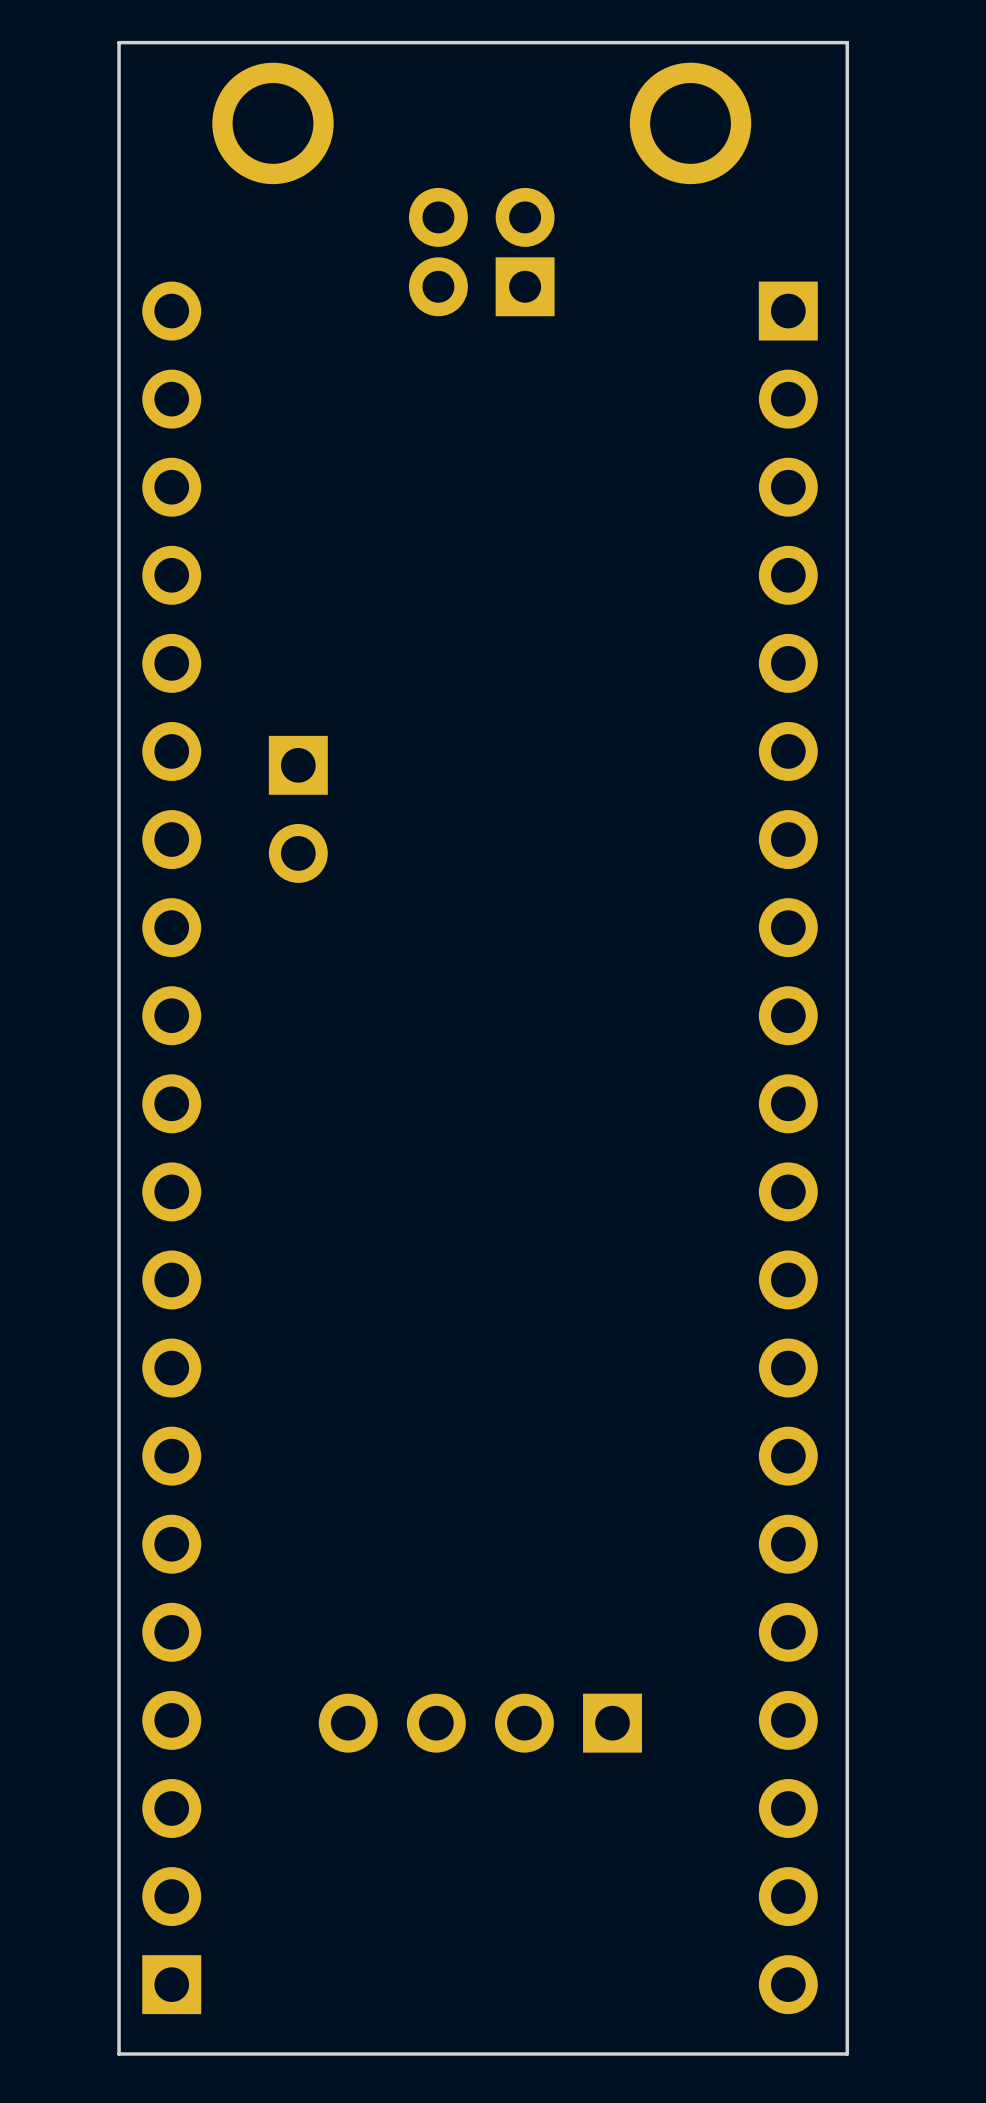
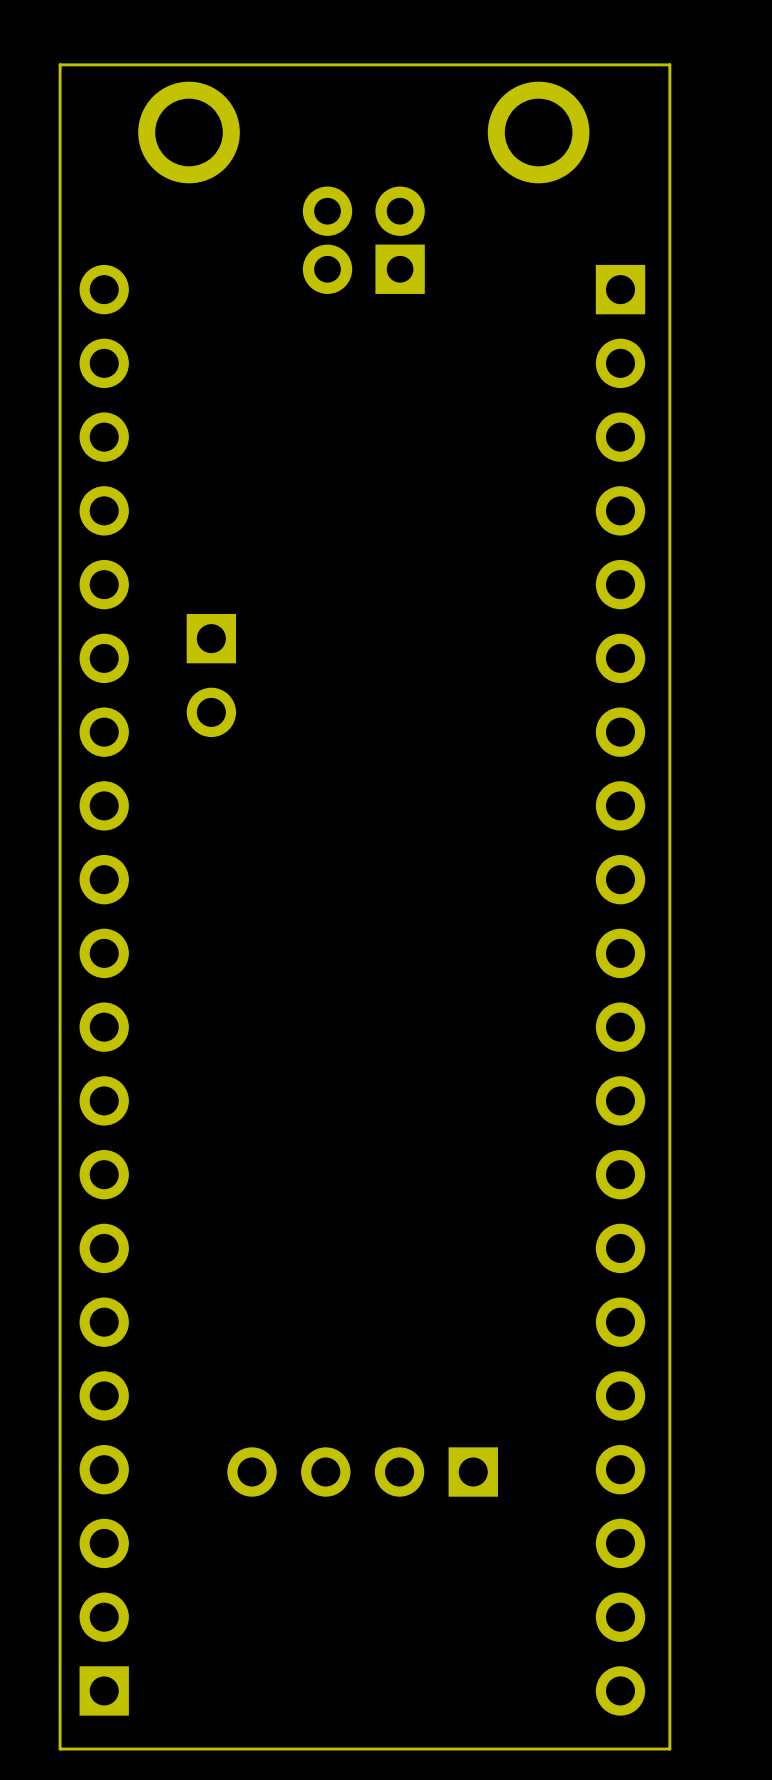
part position: (298, 809) -> (211, 675)

